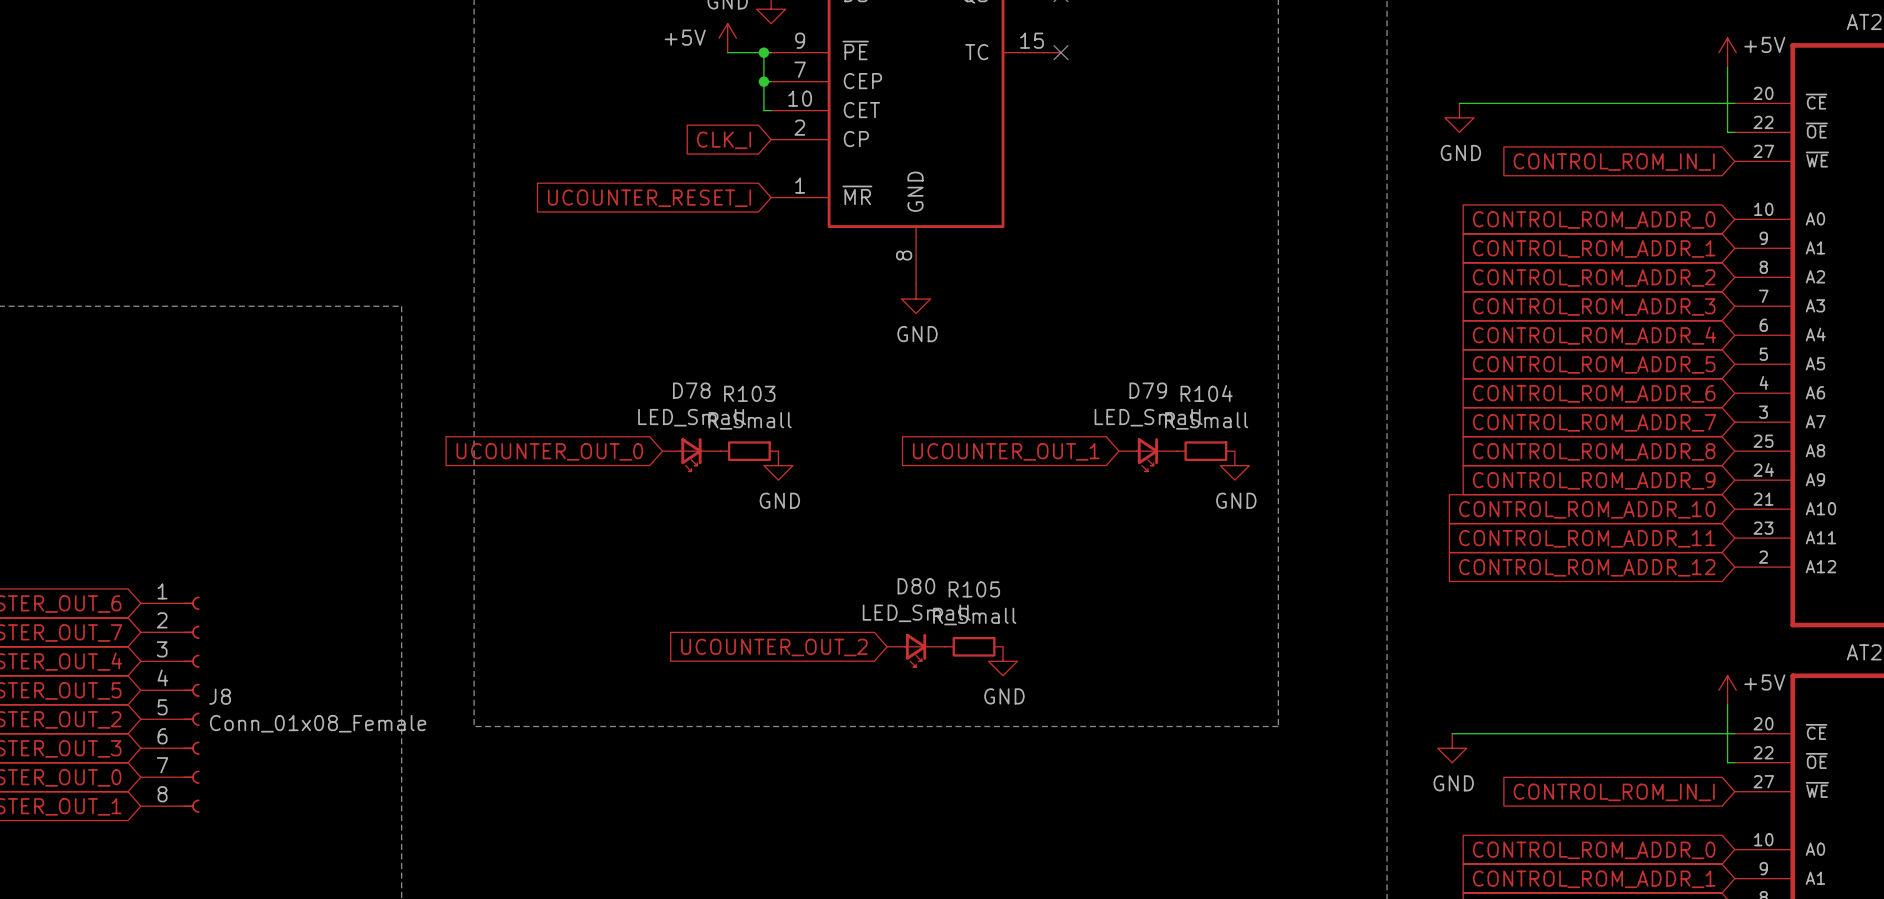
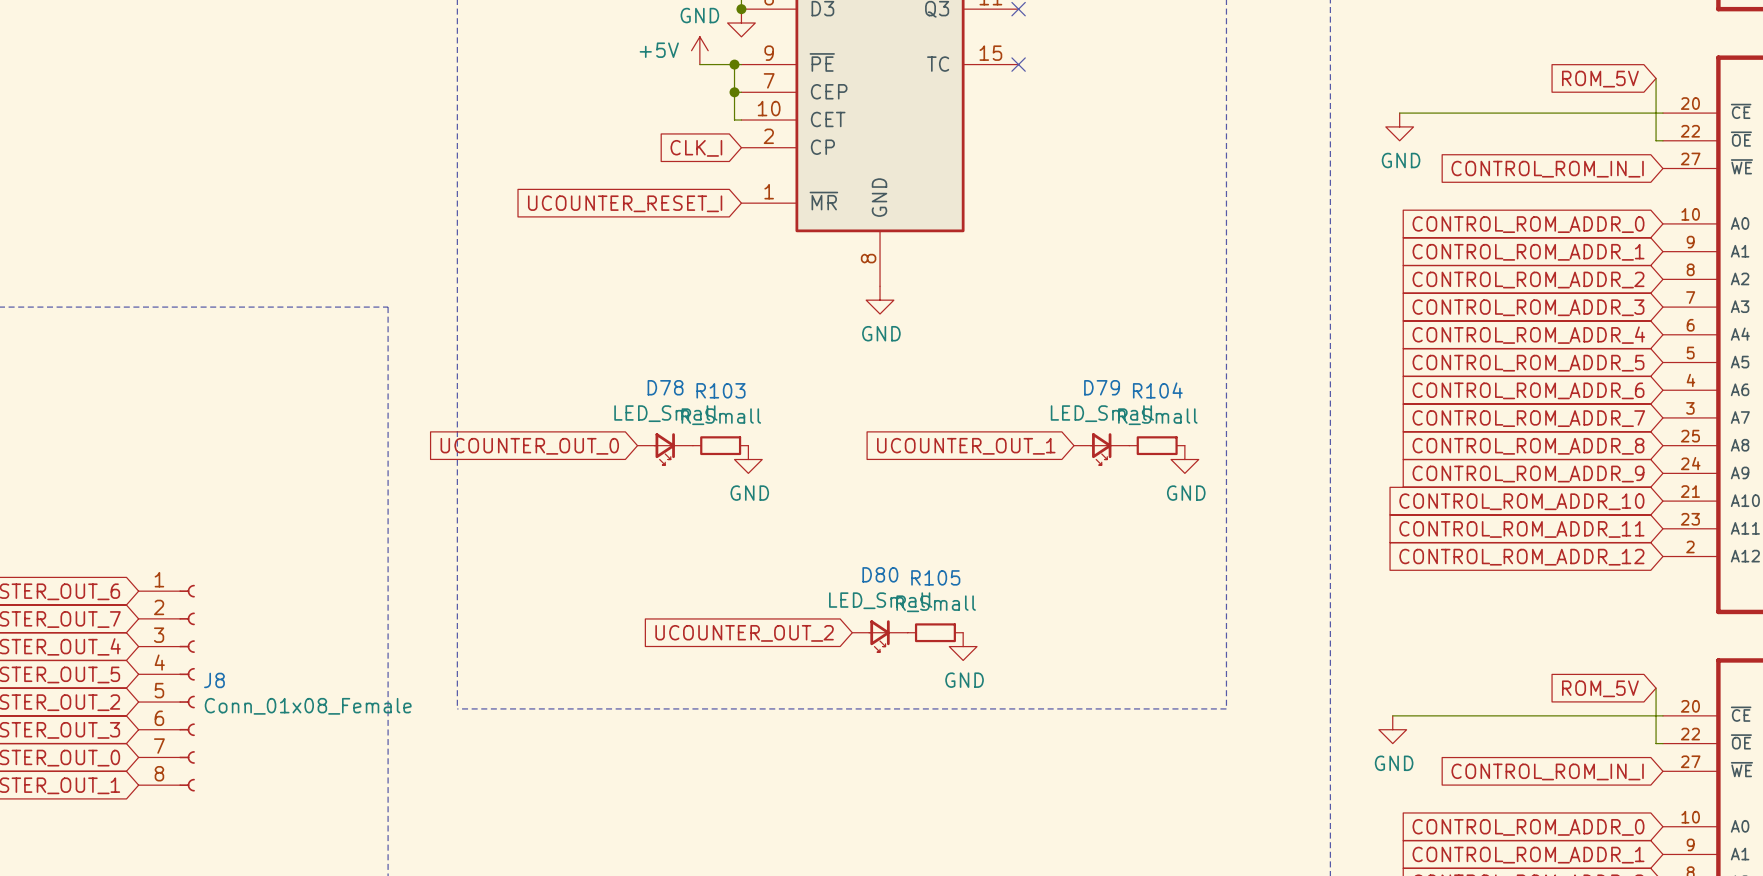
power symbol: +5V (1727, 52) -> none
global label: none -> ROM_5V (1600, 79)
power symbol: +5V (1727, 690) -> none
global label: none -> ROM_5V (1600, 688)

